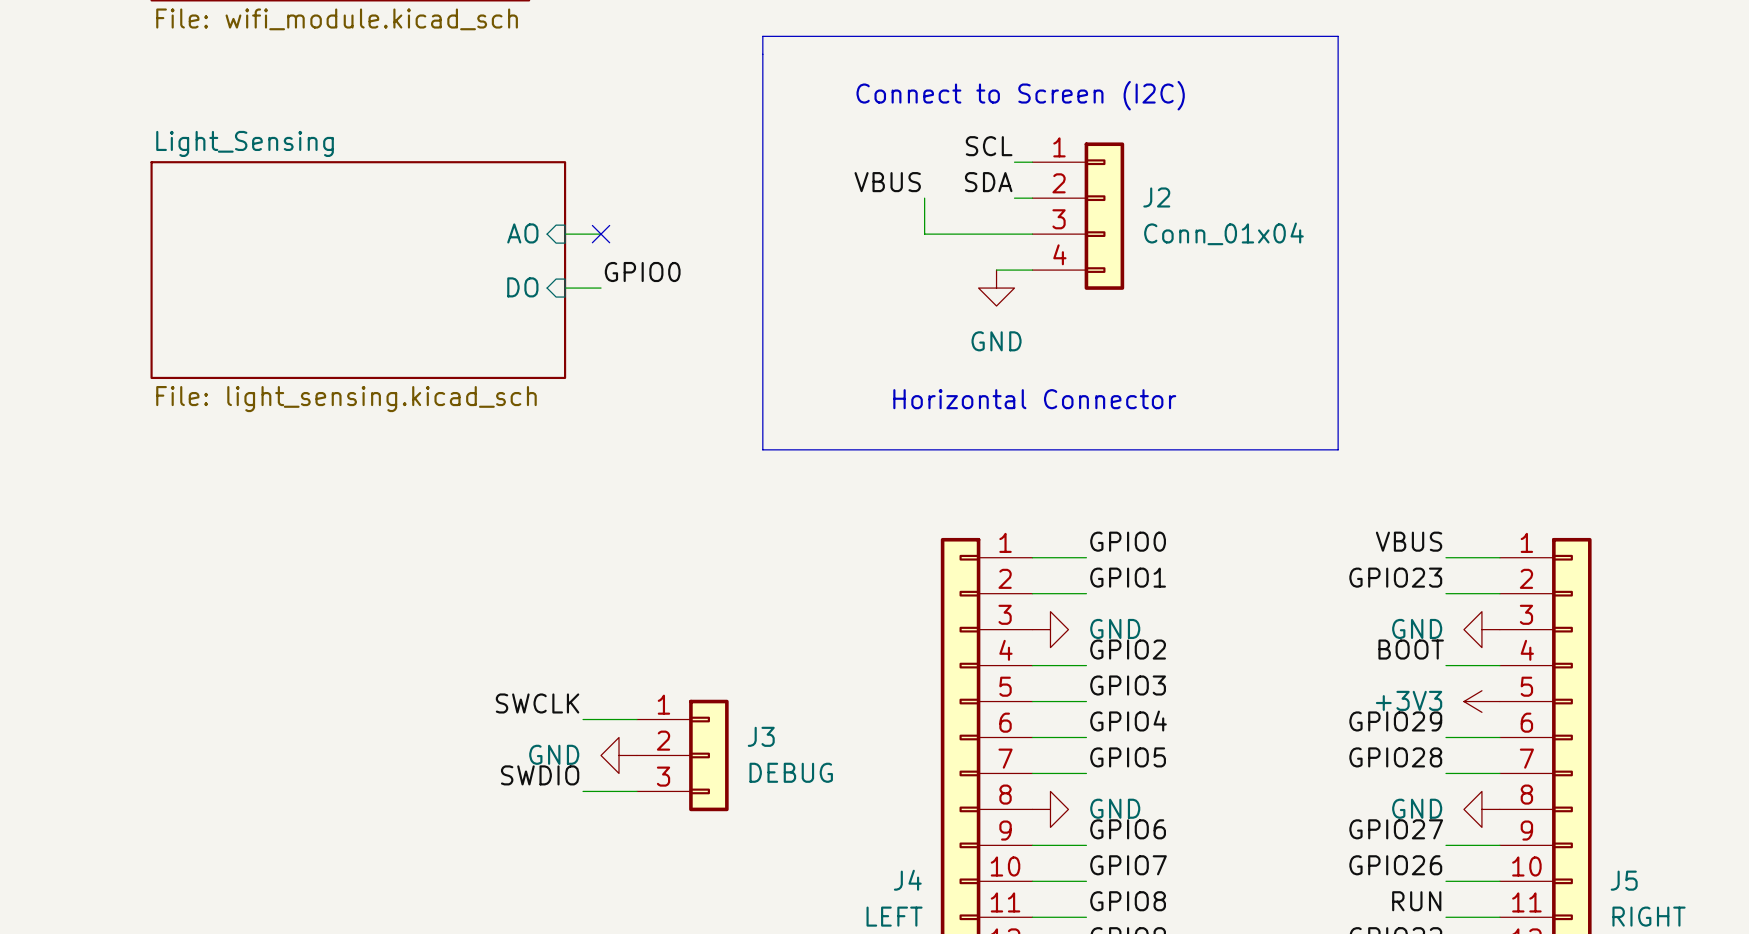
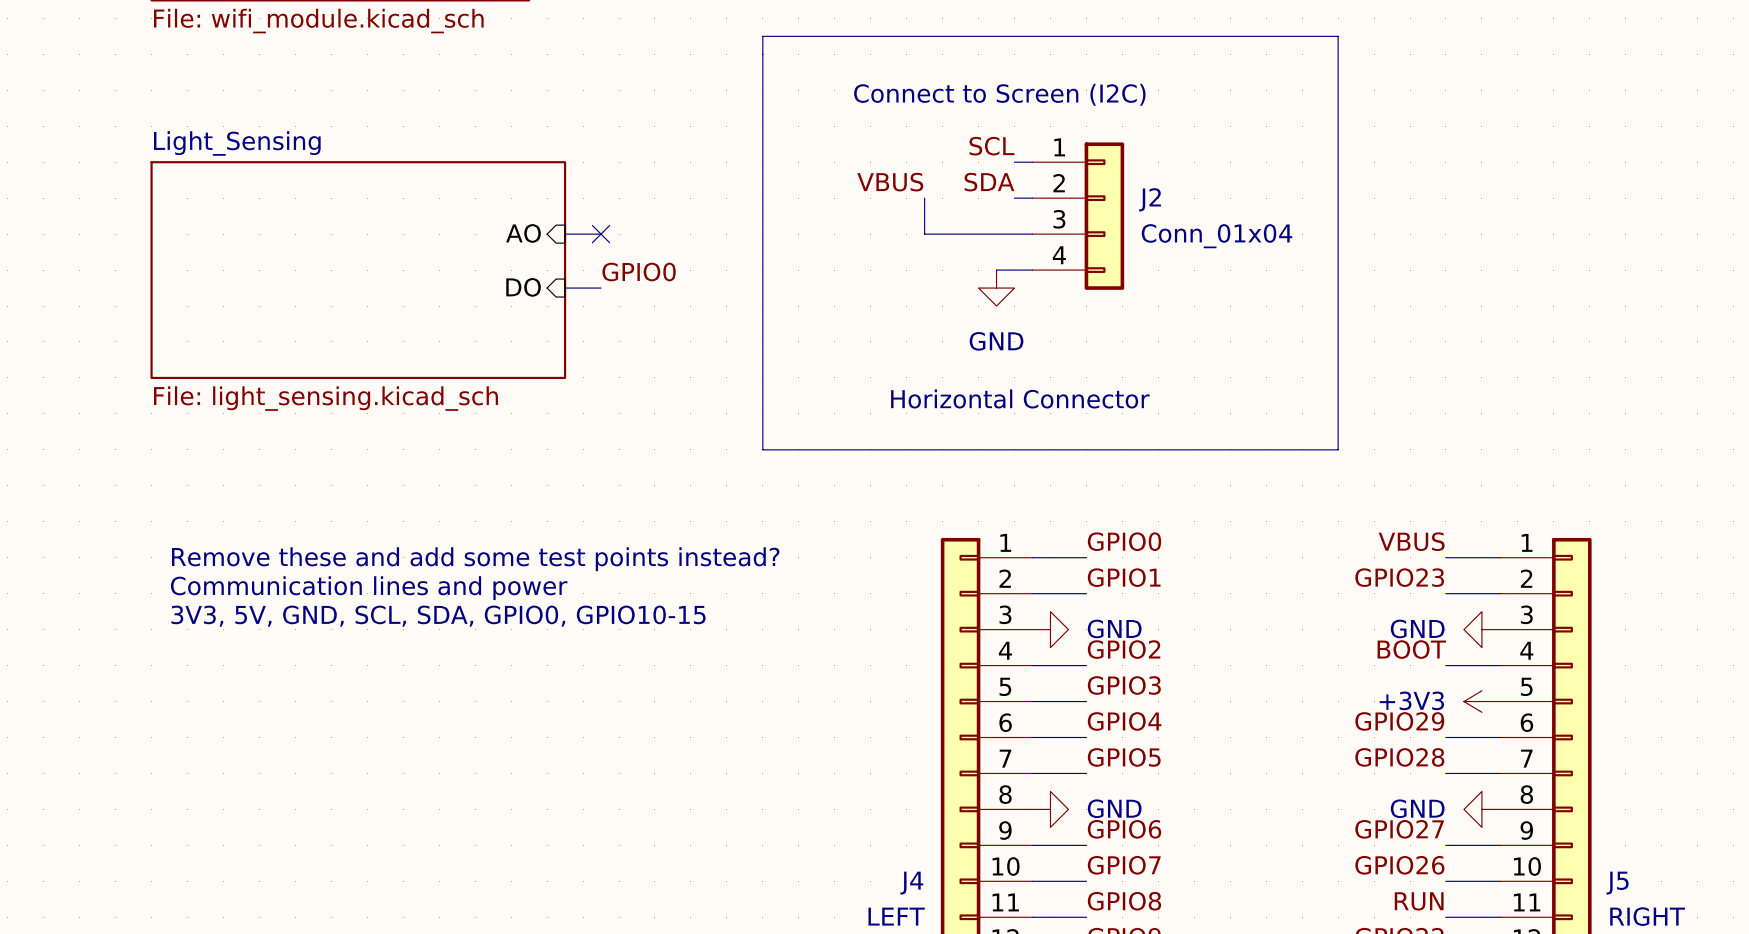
text: none -> Remove these and add some test points instead? (475, 559)
text: none -> Communication lines and power (369, 588)
text: none -> 3V3, 5V, GND, SCL, SDA, GPIO0, GPIO10-15 (438, 616)
label: SWCLK (537, 703) -> none
wire: (583, 719) (636, 719) -> none
power symbol: GND (619, 755) -> none
J3: DEBUG (682, 755) -> none
label: SWDIO (540, 775) -> none
wire: (583, 791) (636, 791) -> none

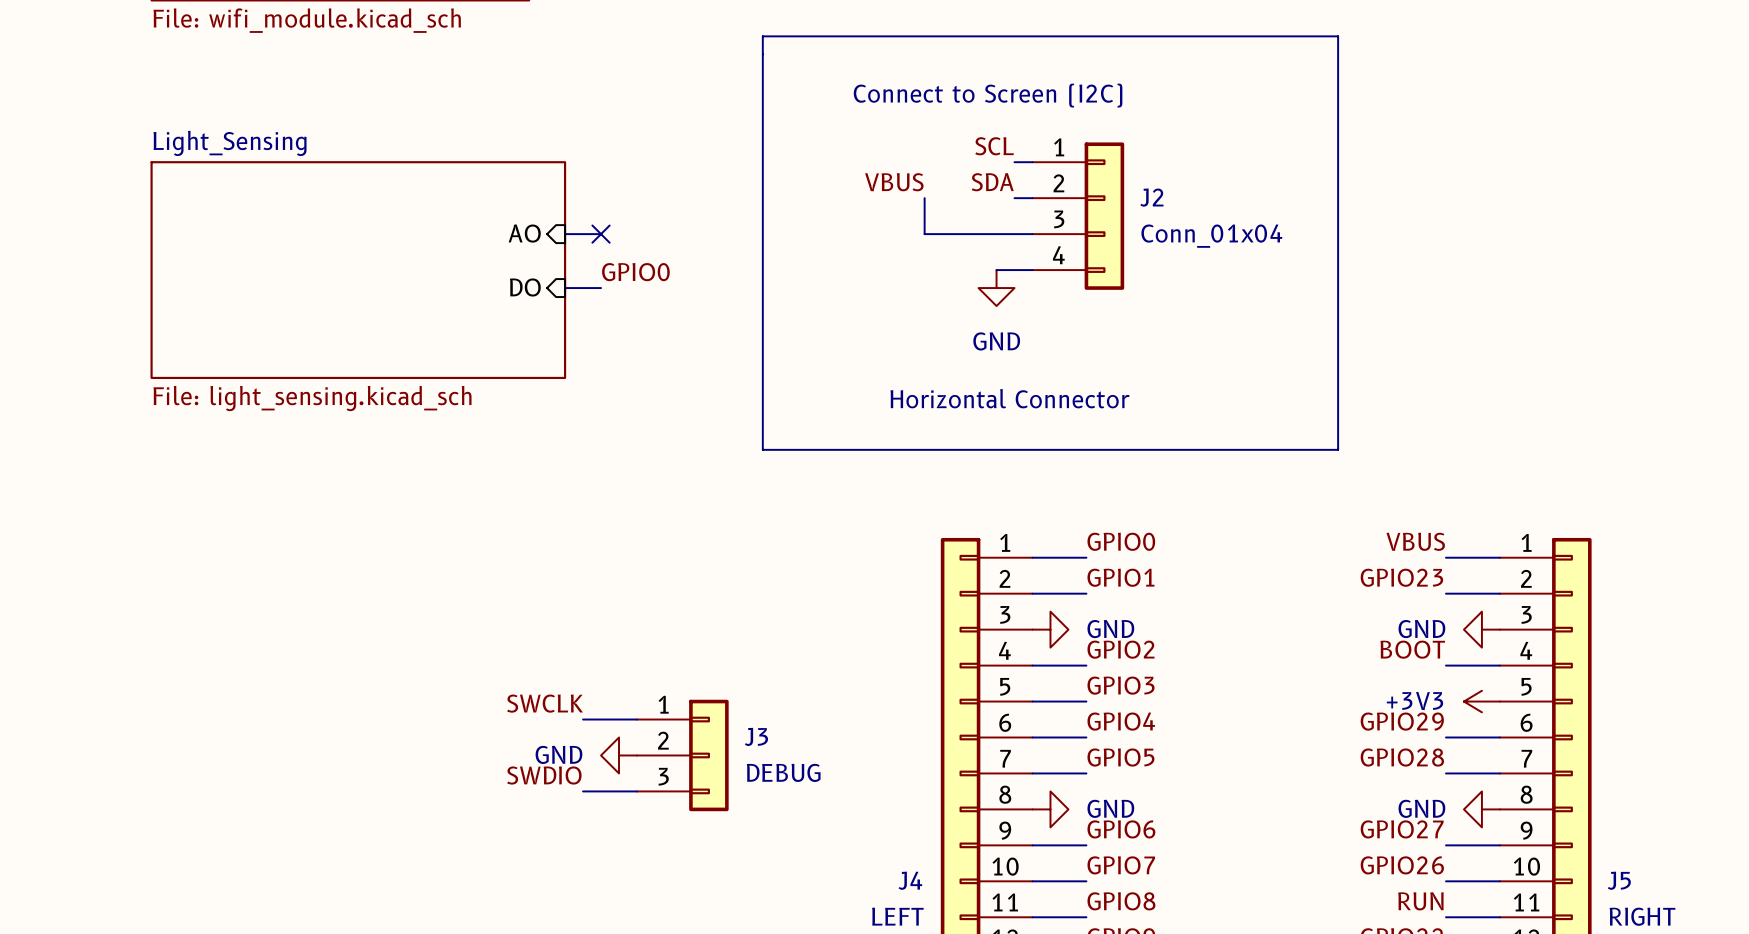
text: Remove these and add some test points instead? (475, 559) -> none
text: Communication lines and power (369, 588) -> none
text: 3V3, 5V, GND, SCL, SDA, GPIO0, GPIO10-15 (438, 616) -> none
label: none -> SWCLK (545, 703)
wire: none -> (583, 719) (636, 719)
power symbol: none -> GND (619, 755)
J3: none -> DEBUG (682, 755)
label: none -> SWDIO (544, 775)
wire: none -> (583, 791) (636, 791)

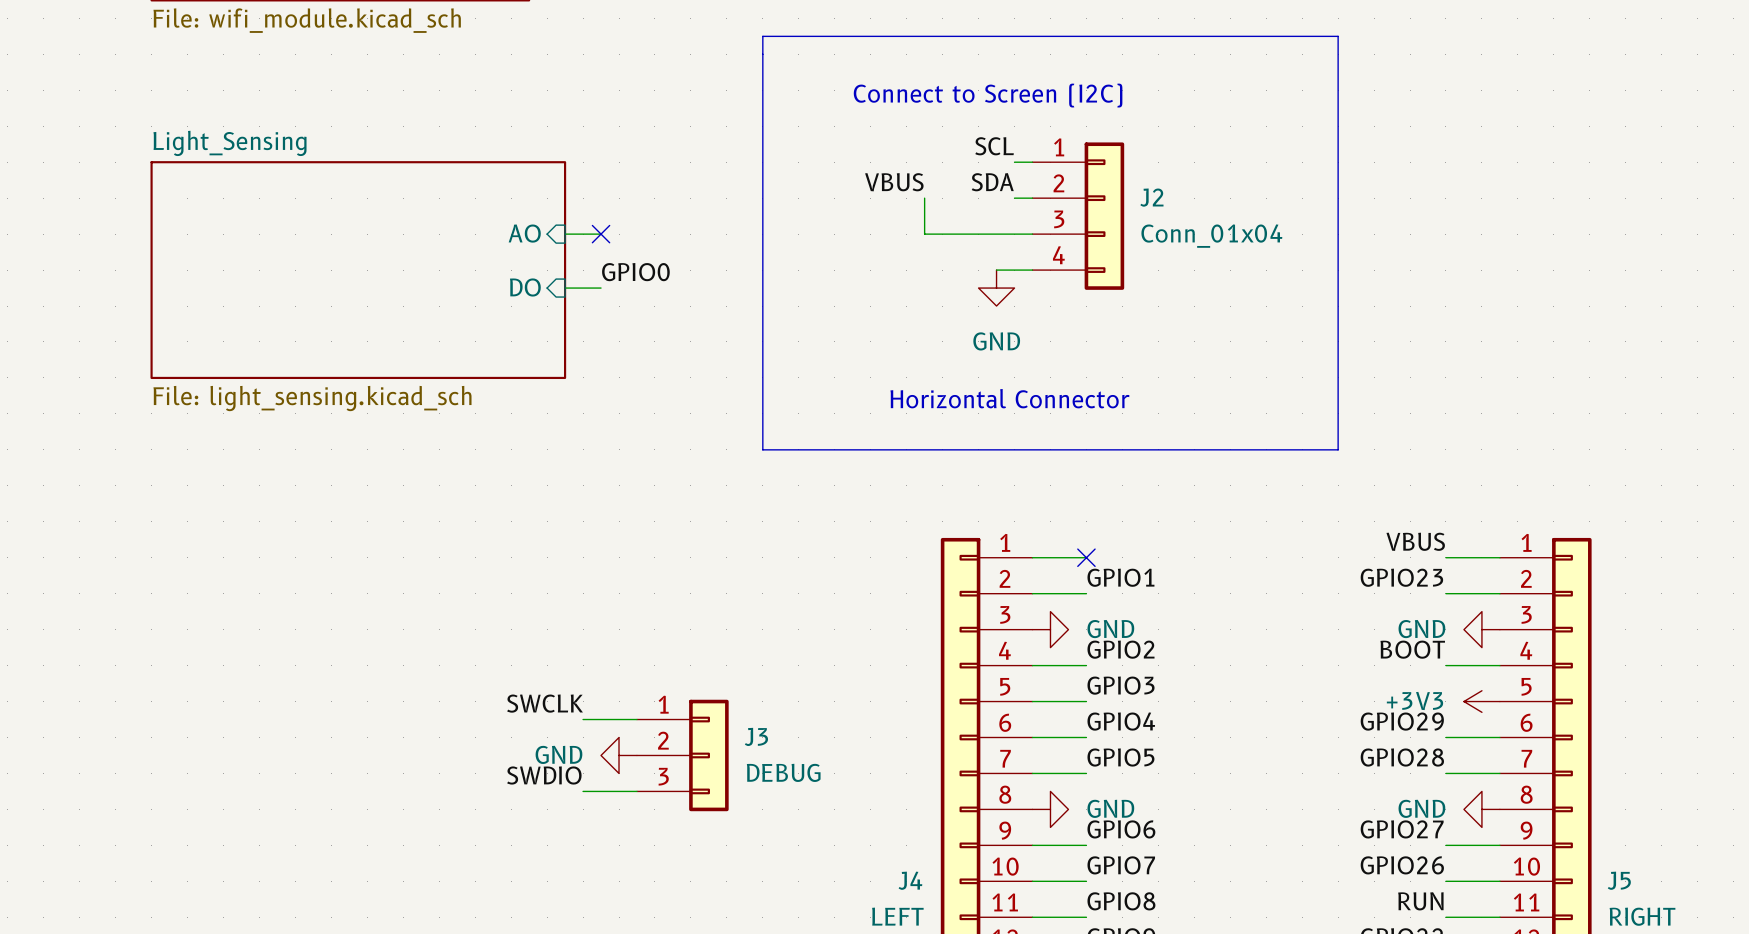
label: GPIO0 (1121, 541) -> none
no-connect mark: none -> (1086, 557)

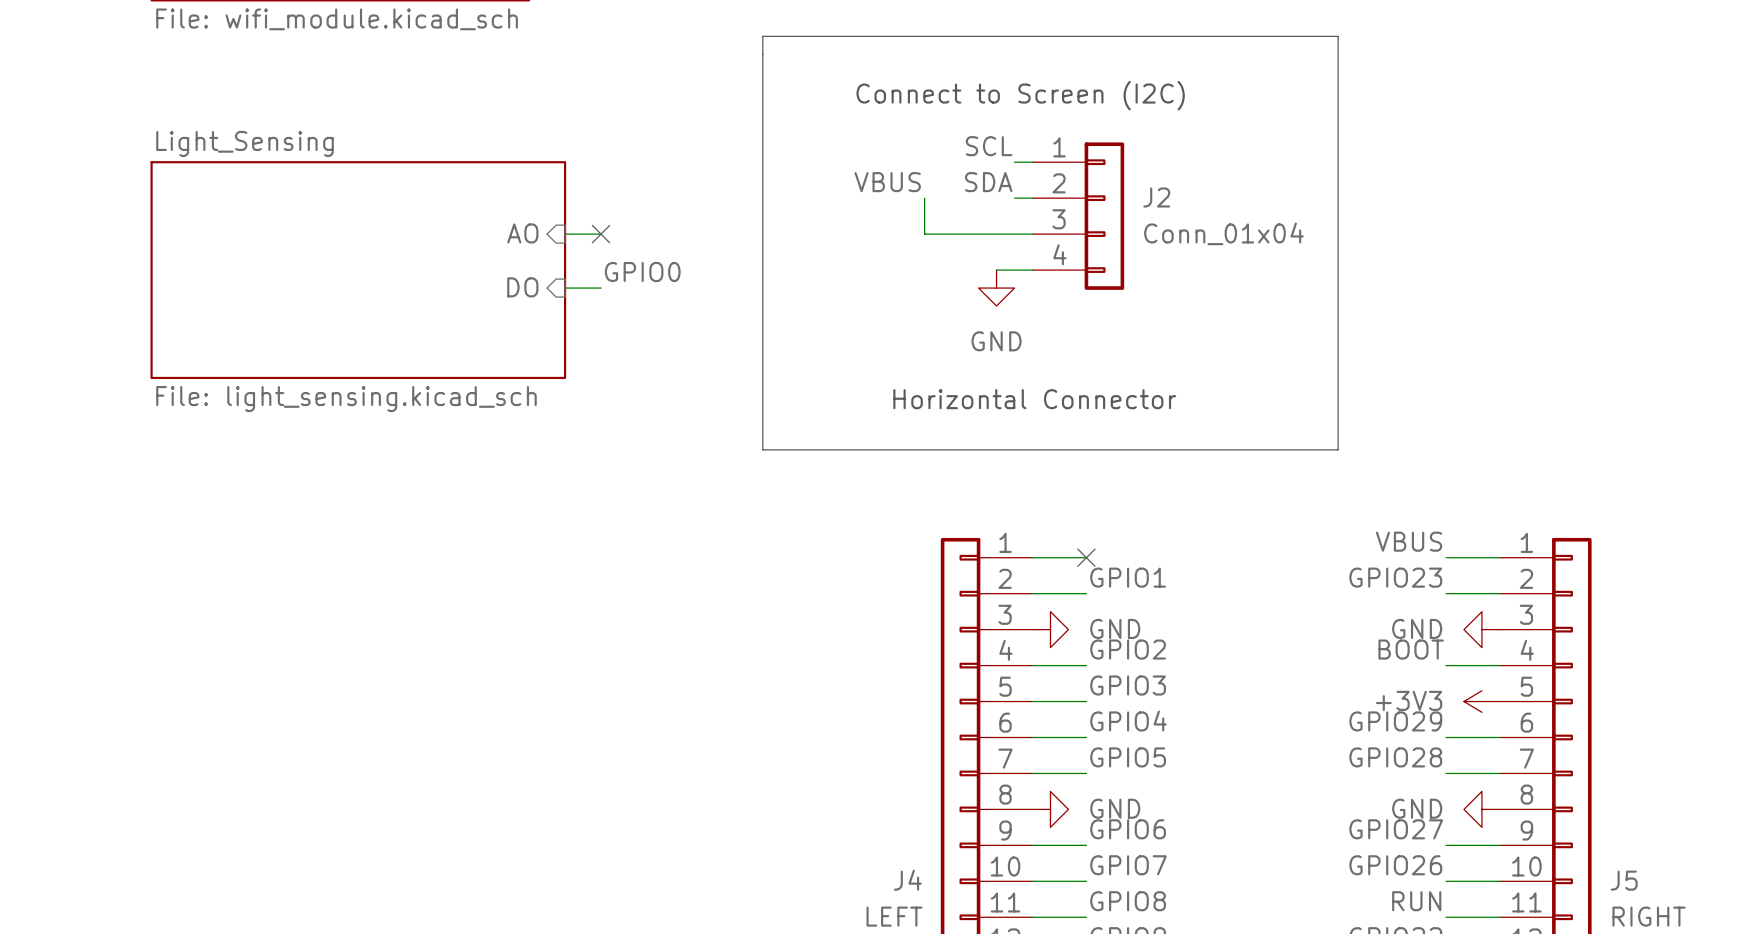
label: SWCLK (545, 703) -> none
wire: (583, 719) (636, 719) -> none
power symbol: GND (619, 755) -> none
J3: DEBUG (682, 755) -> none
label: SWDIO (544, 775) -> none
wire: (583, 791) (636, 791) -> none

